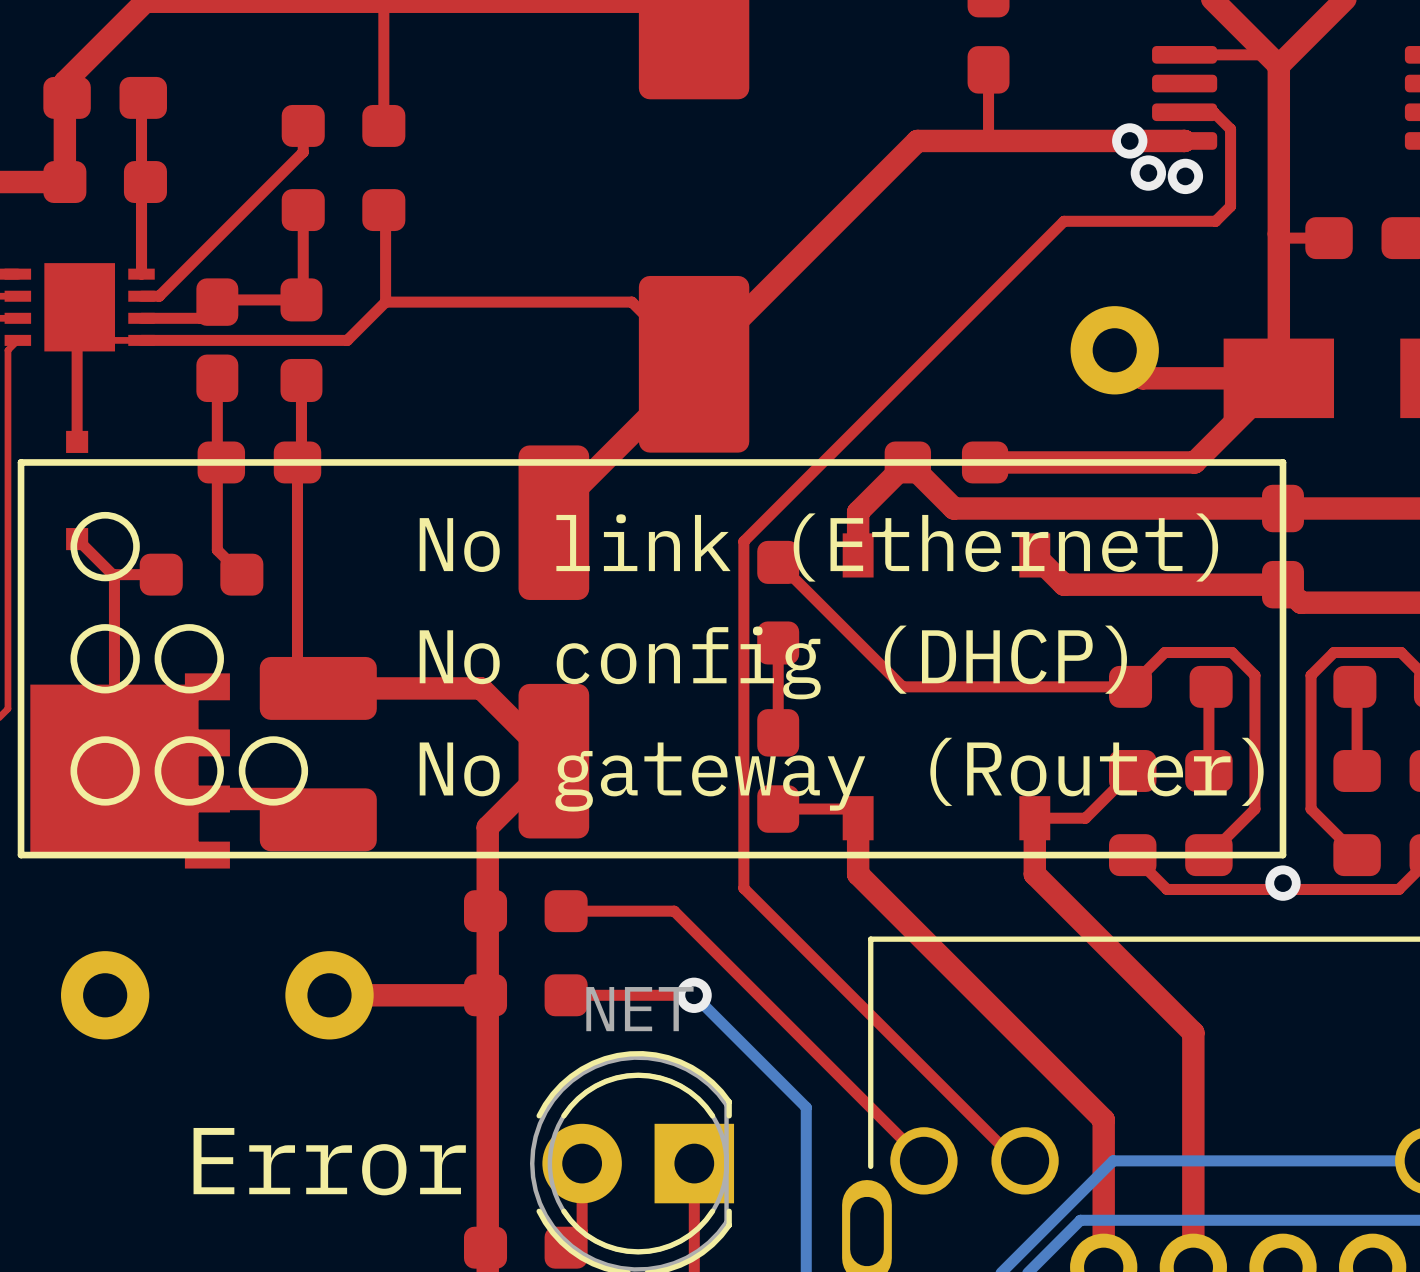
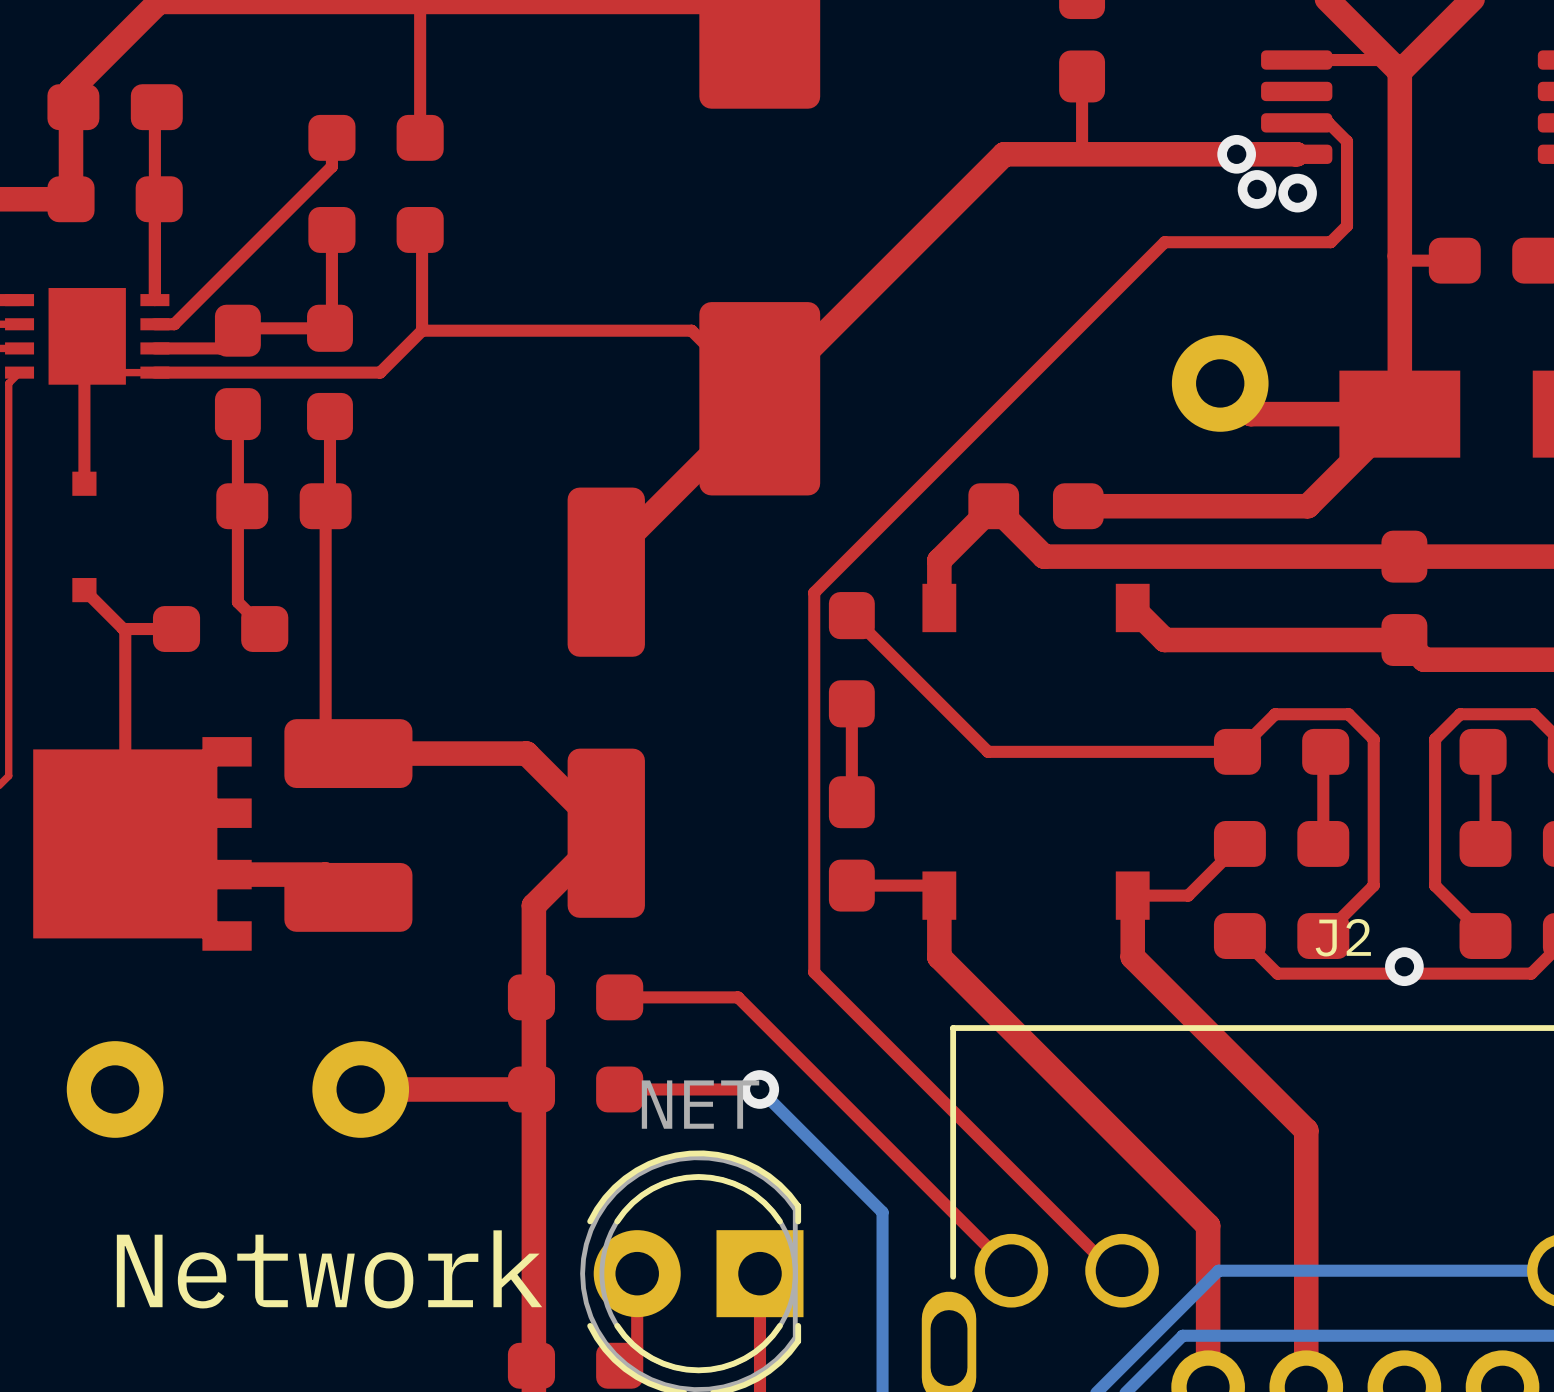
line: (1283, 462) (21, 462) (21, 855) (1283, 855) (1283, 462) -> none
drawing: [70, 511, 309, 806] -> none
text: No link (Ethernet) (818, 547) -> none
text: No config (DHCP) (773, 662) -> none
text: No gateway (Router) (841, 774) -> none
J2 name: none -> J2 (1343, 937)
text: Error (329, 1161) -> Network (329, 1269)

